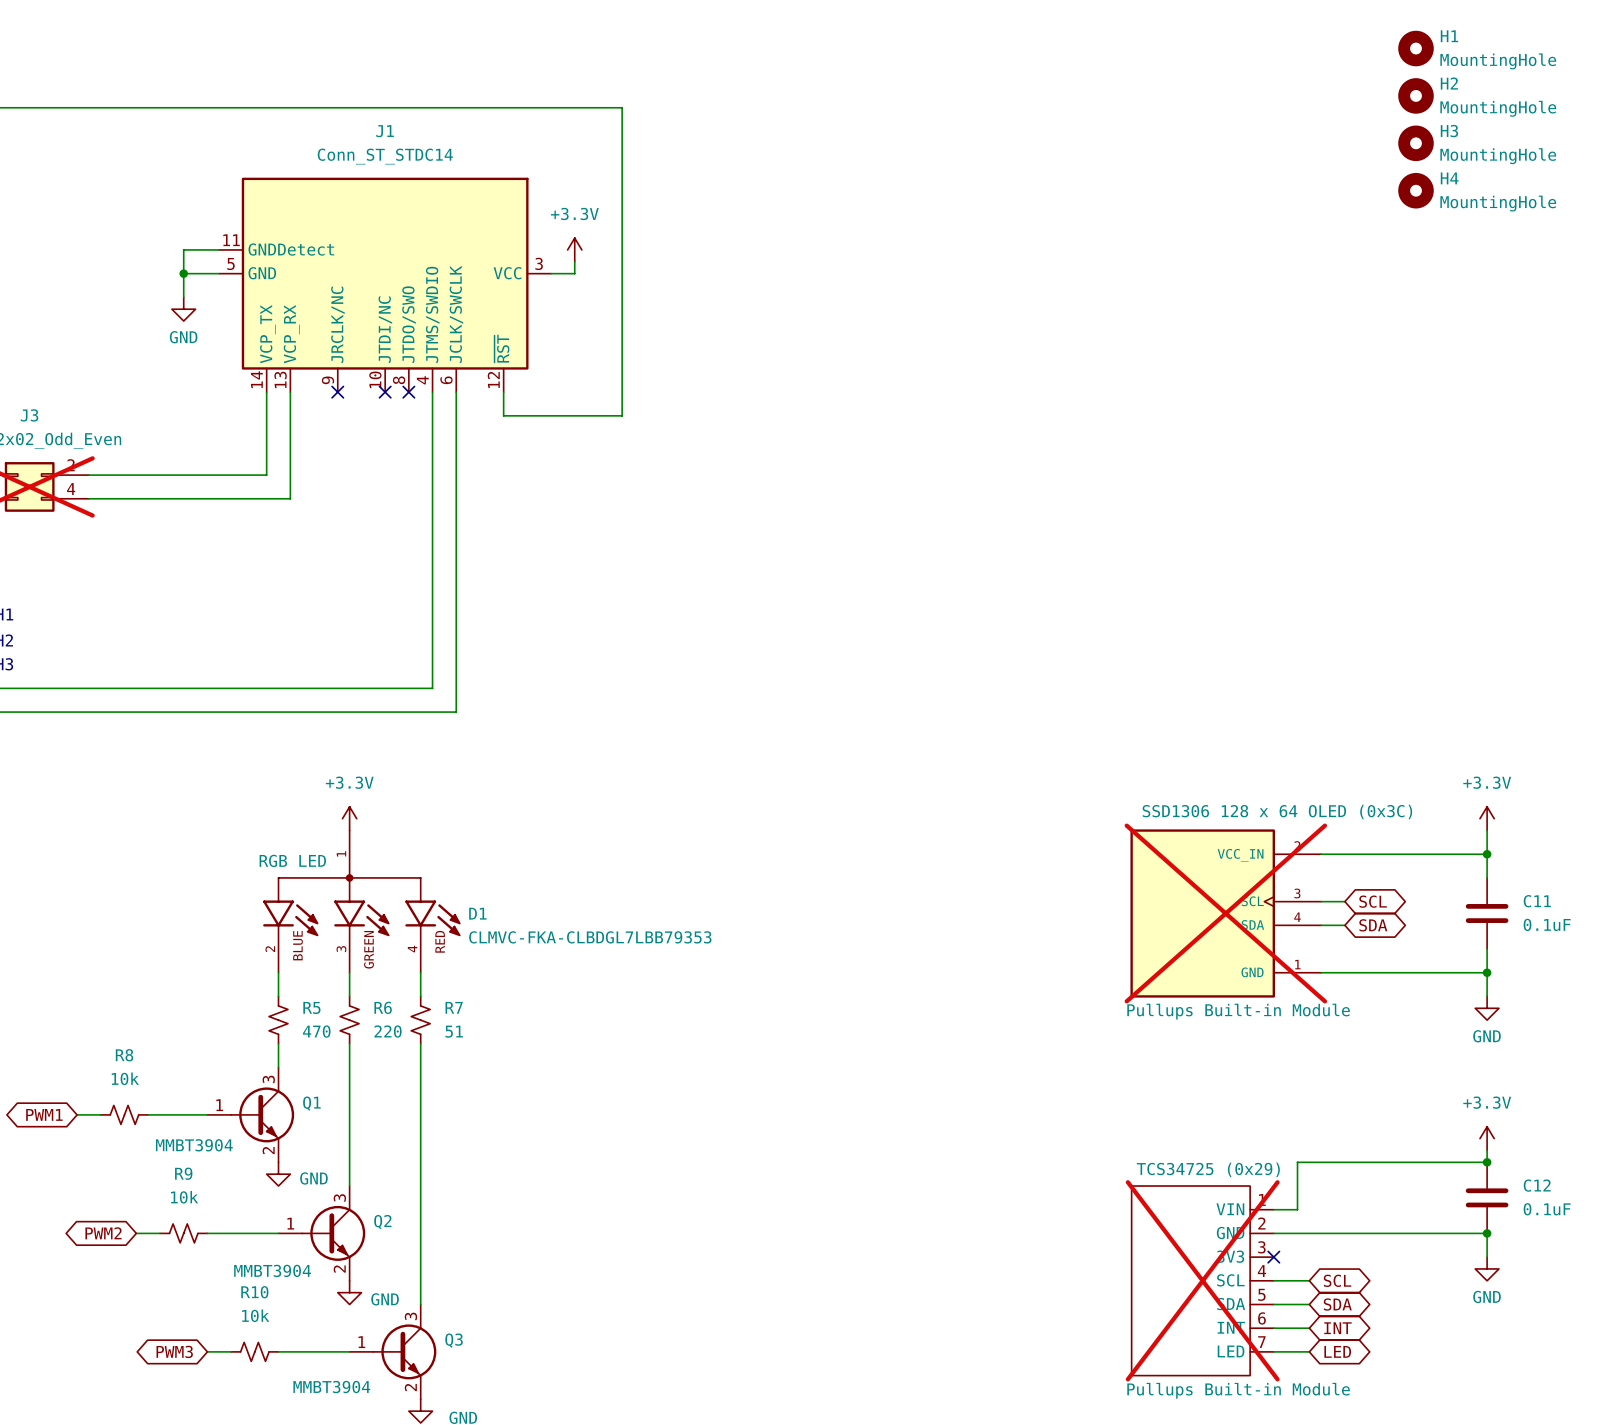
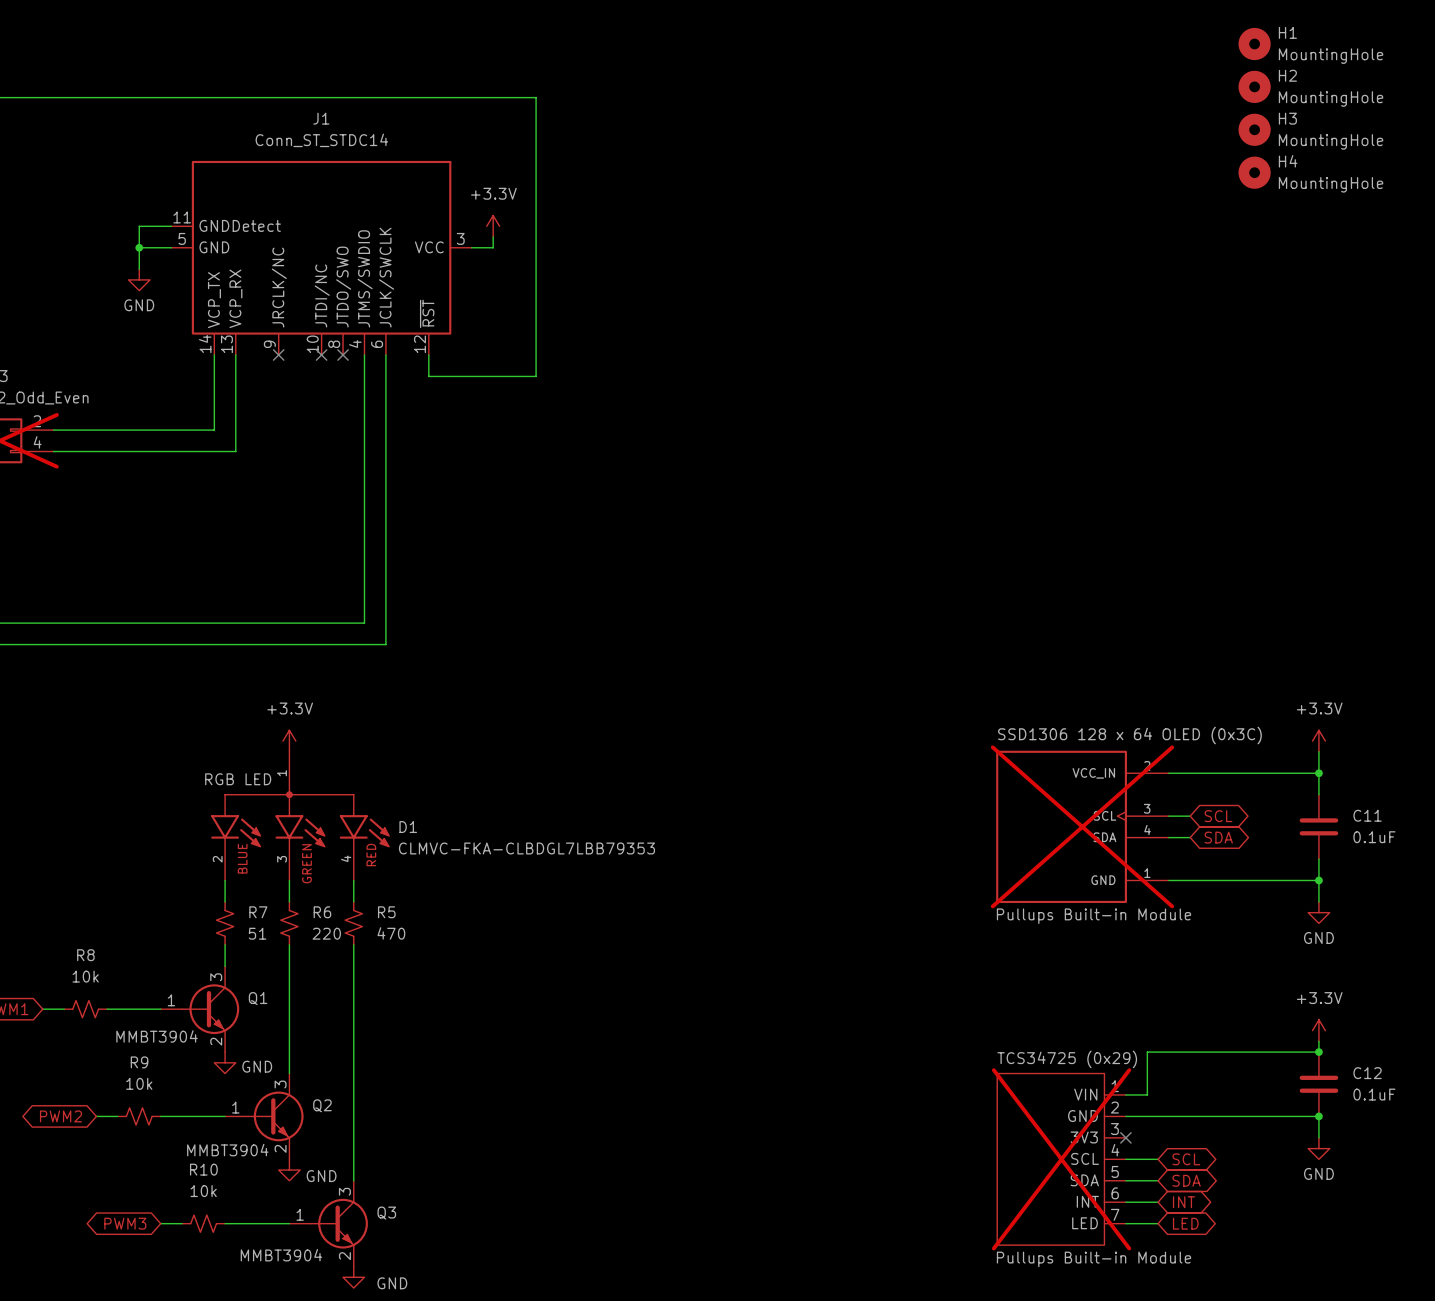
R5 name: R5 (311, 1007) -> R7 (258, 912)
R7 name: R7 (454, 1007) -> R5 (386, 912)
R5 value: 470 (316, 1031) -> 51 (257, 933)
R7 value: 51 (454, 1031) -> 470 (391, 933)

